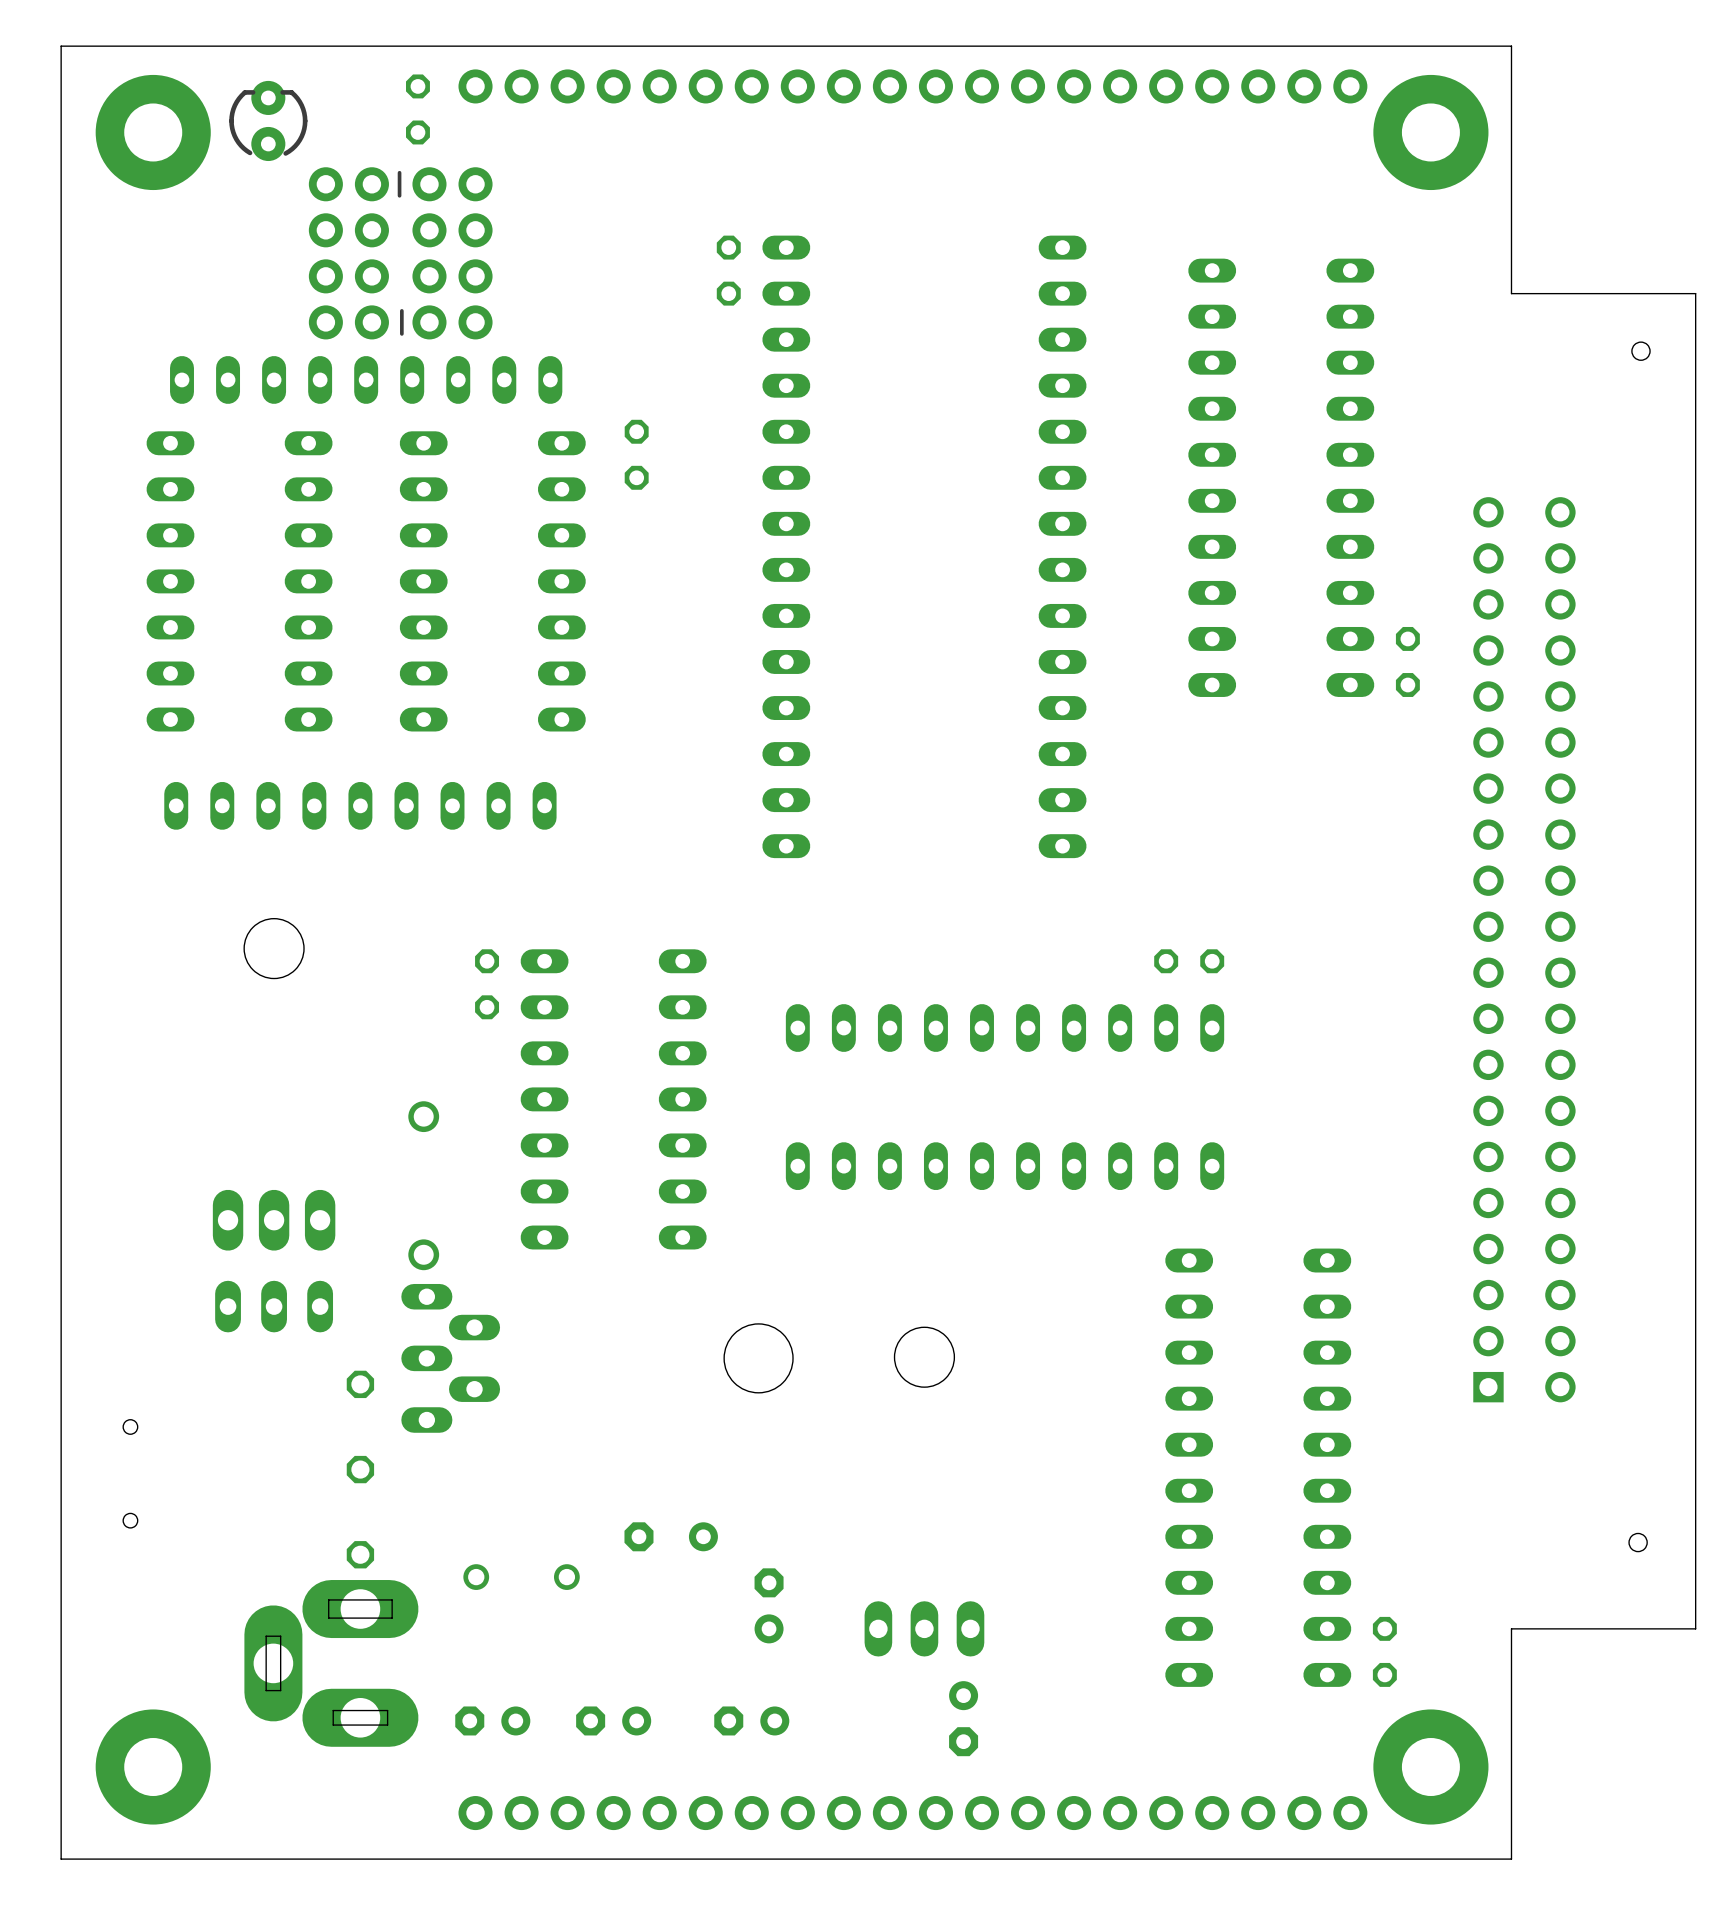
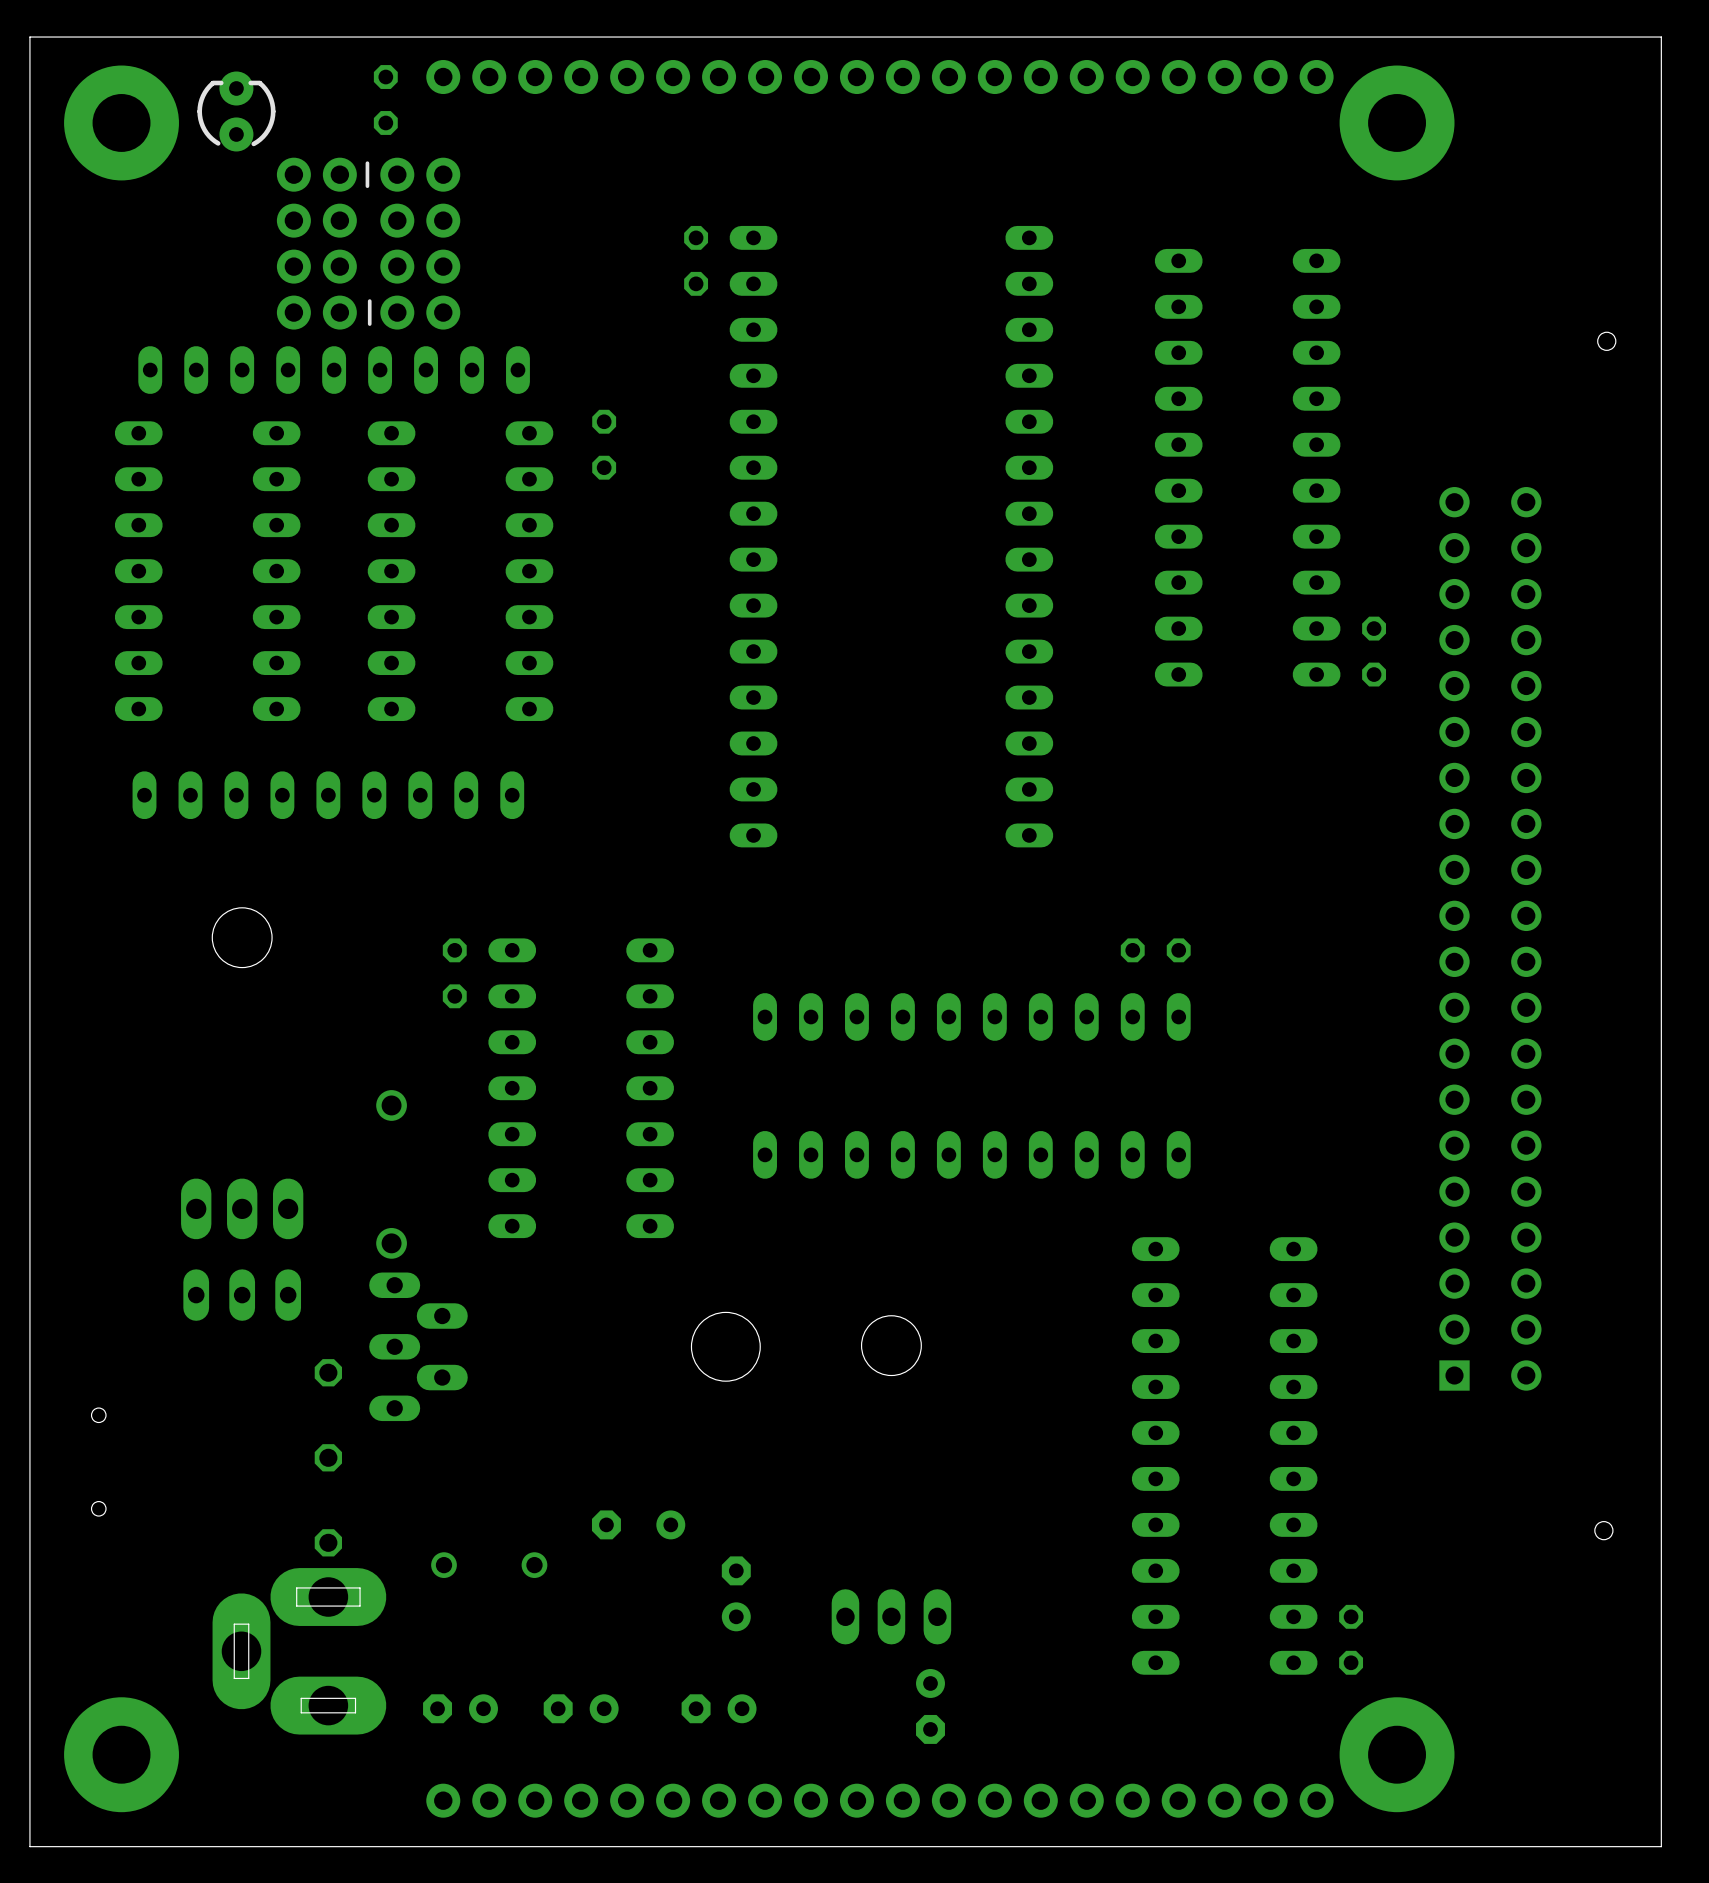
board edge: (1695, 293) (1511, 293) (1511, 46) (61, 46) (61, 1859) -> (1661, 283) (1661, 37) (29, 37) (29, 1846)
board edge: (1695, 1628) (1511, 1628) (1511, 1859) -> (1661, 1616) (1661, 1846) (1477, 1846)

